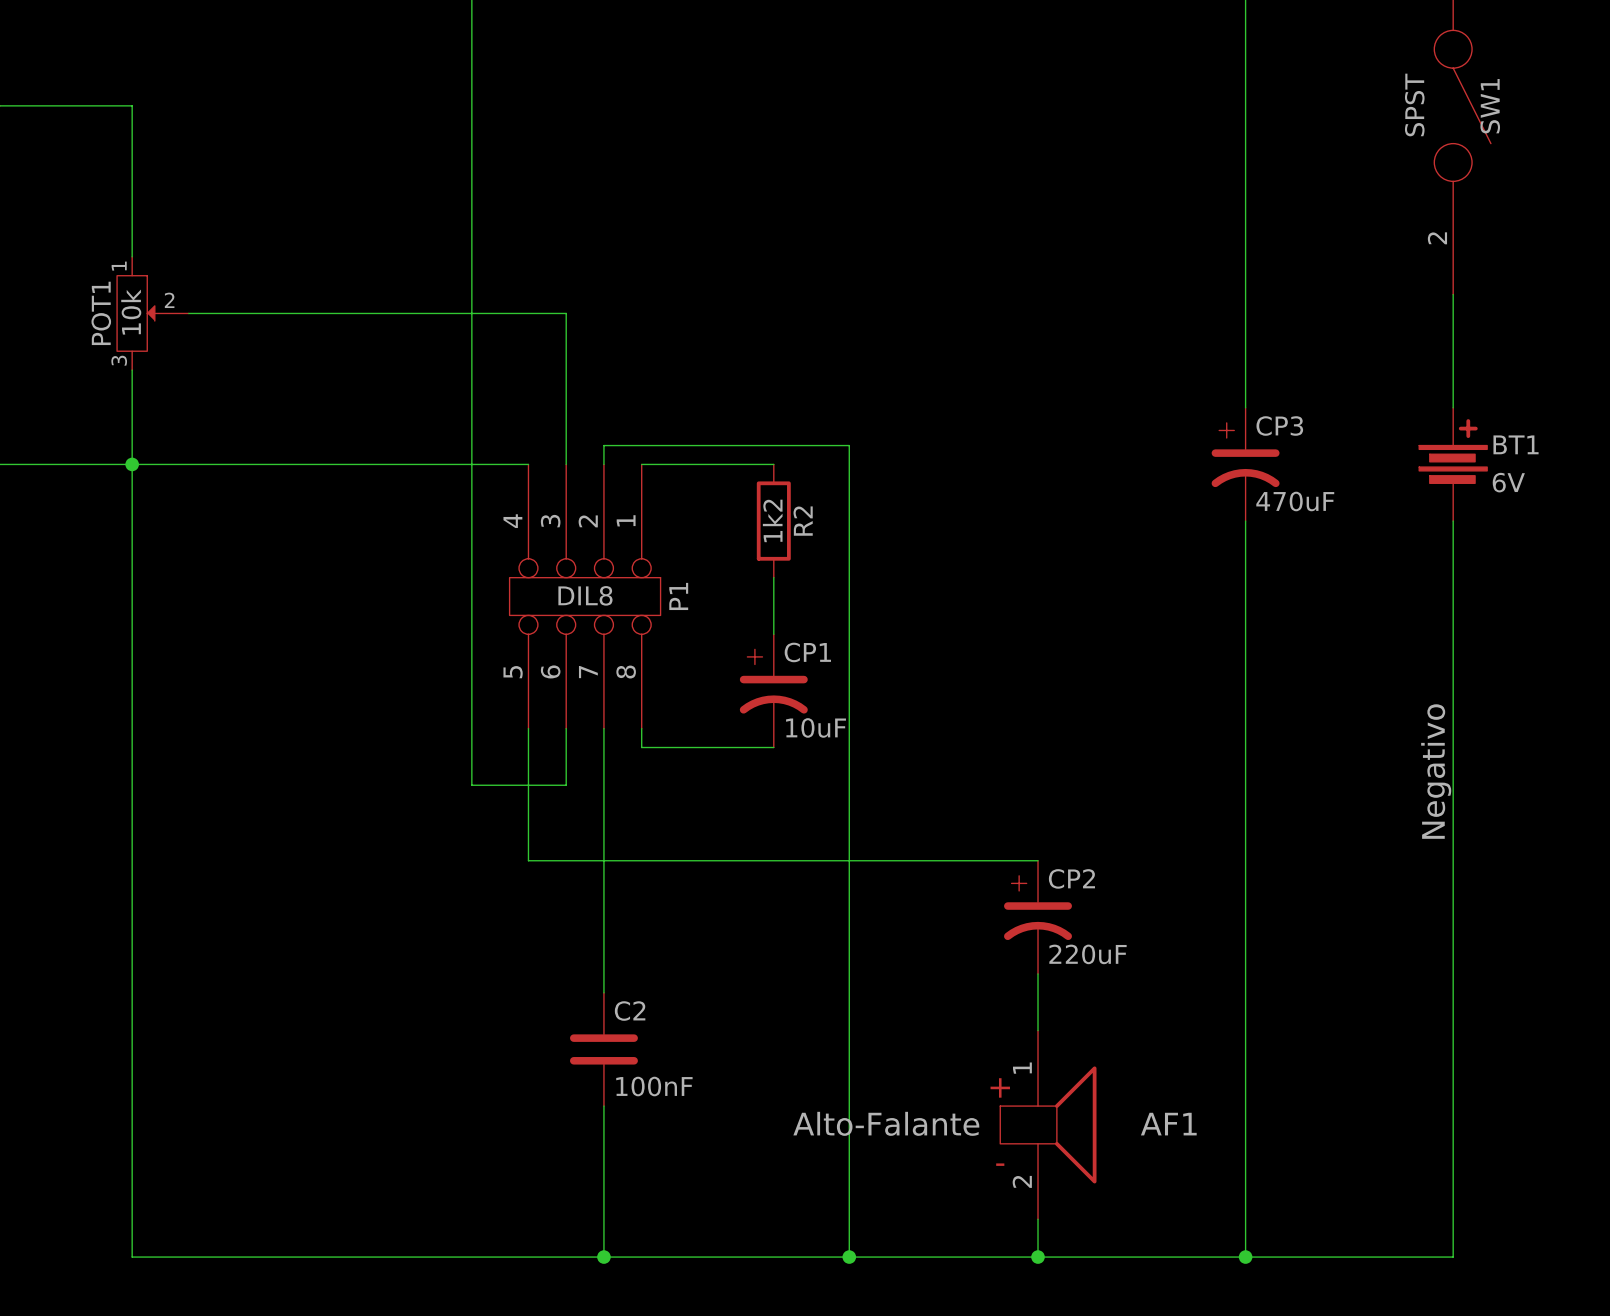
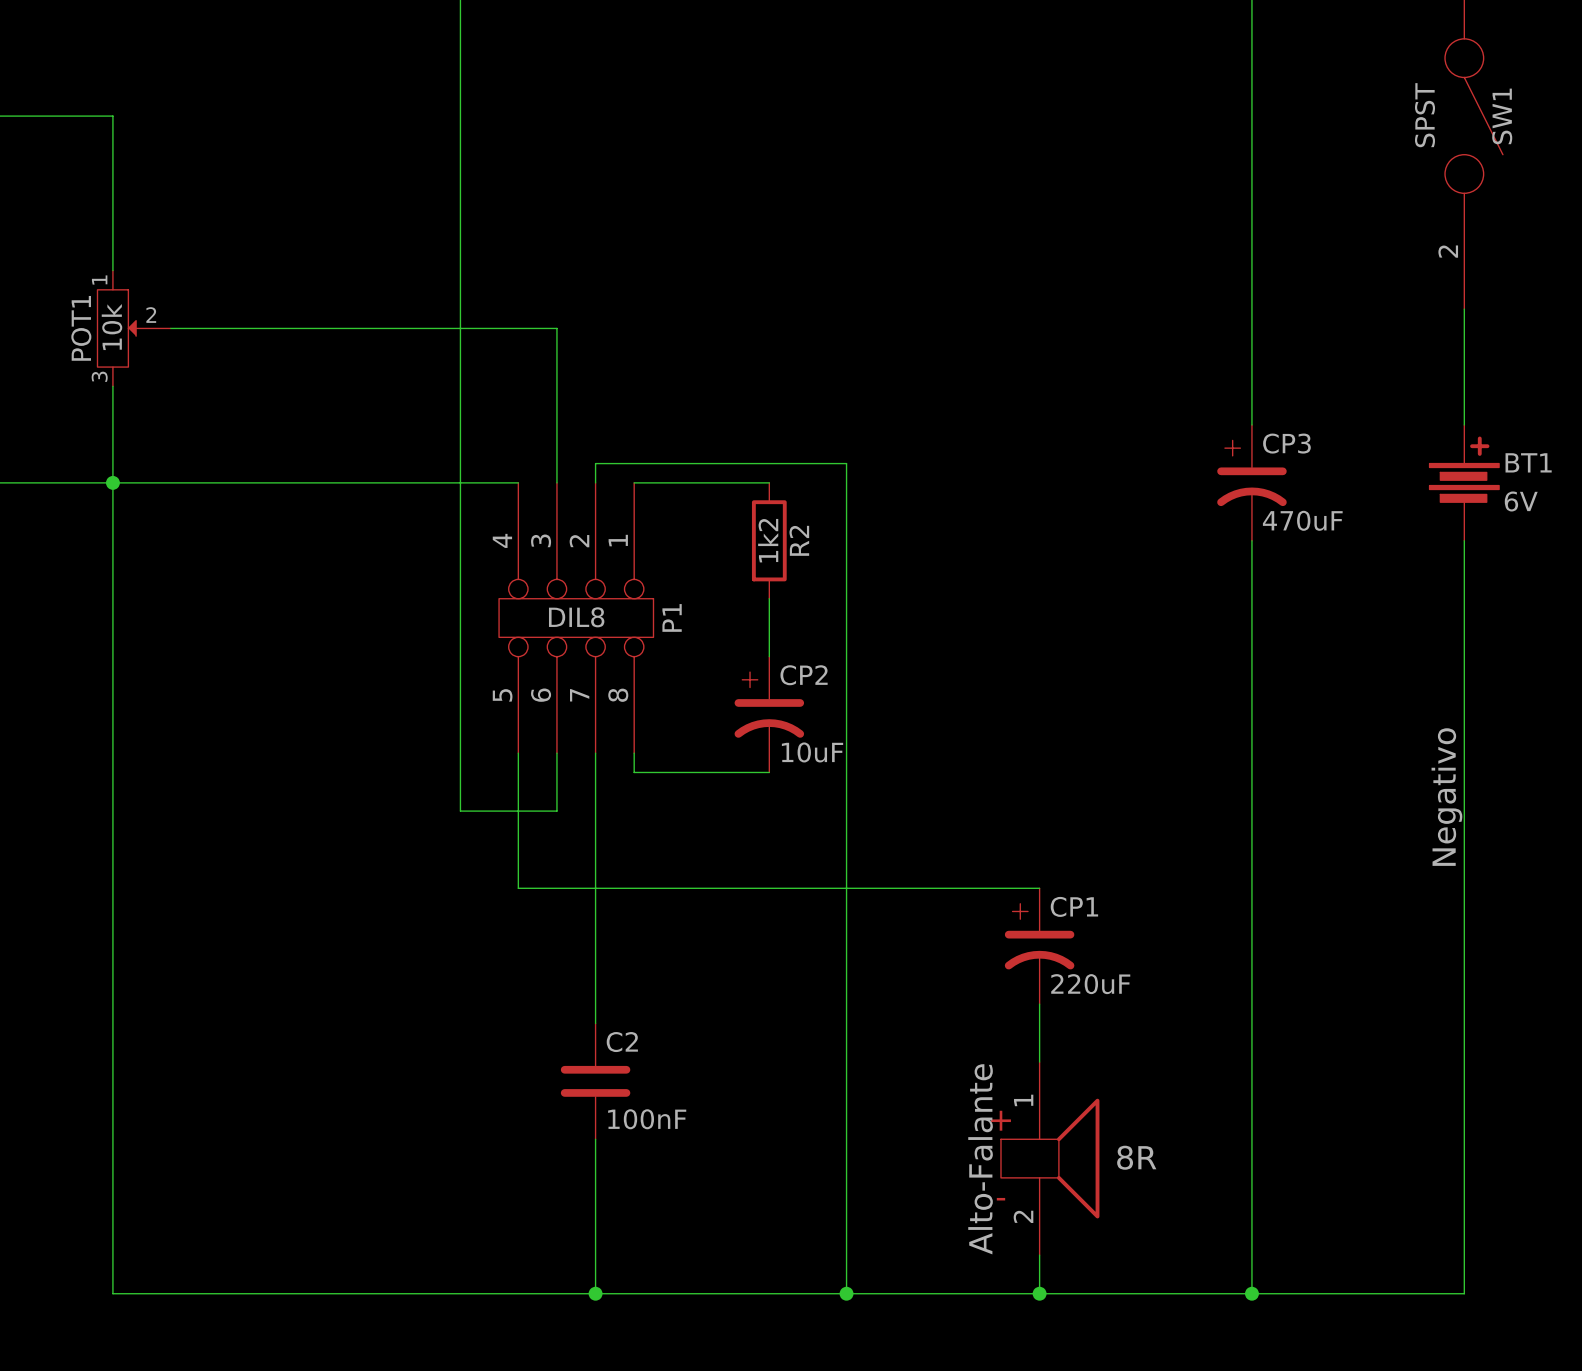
CP1 name: CP1 (807, 652) -> CP2 (804, 675)
CP2 name: CP2 (1071, 878) -> CP1 (1074, 906)
AF1 value: Alto-Falante (886, 1123) -> 8R (1136, 1157)
AF1 name: AF1 (1168, 1124) -> Alto-Falante (980, 1159)

